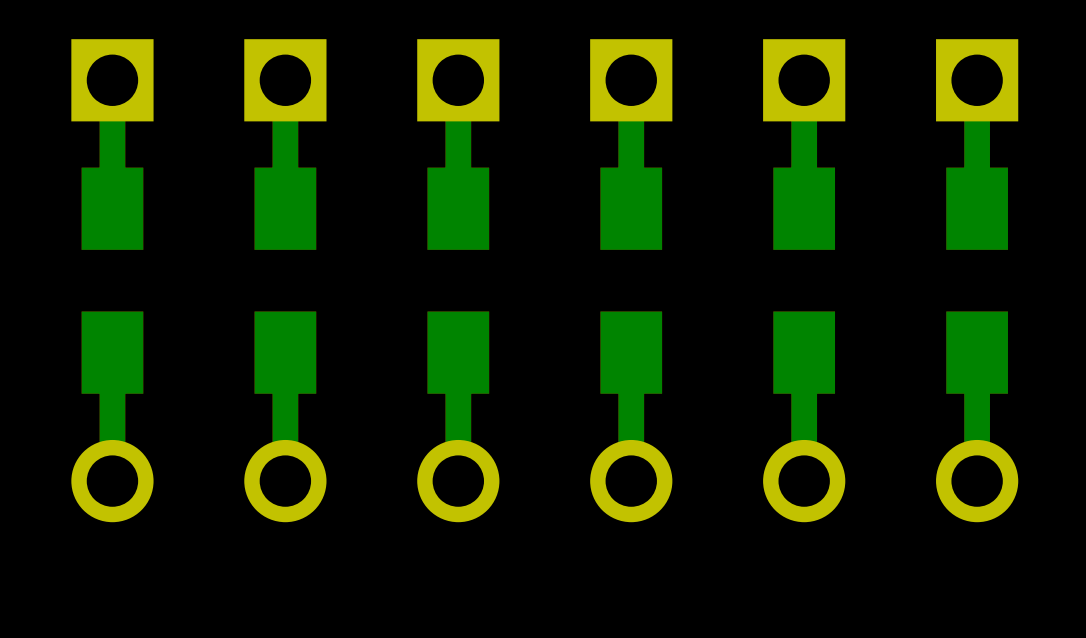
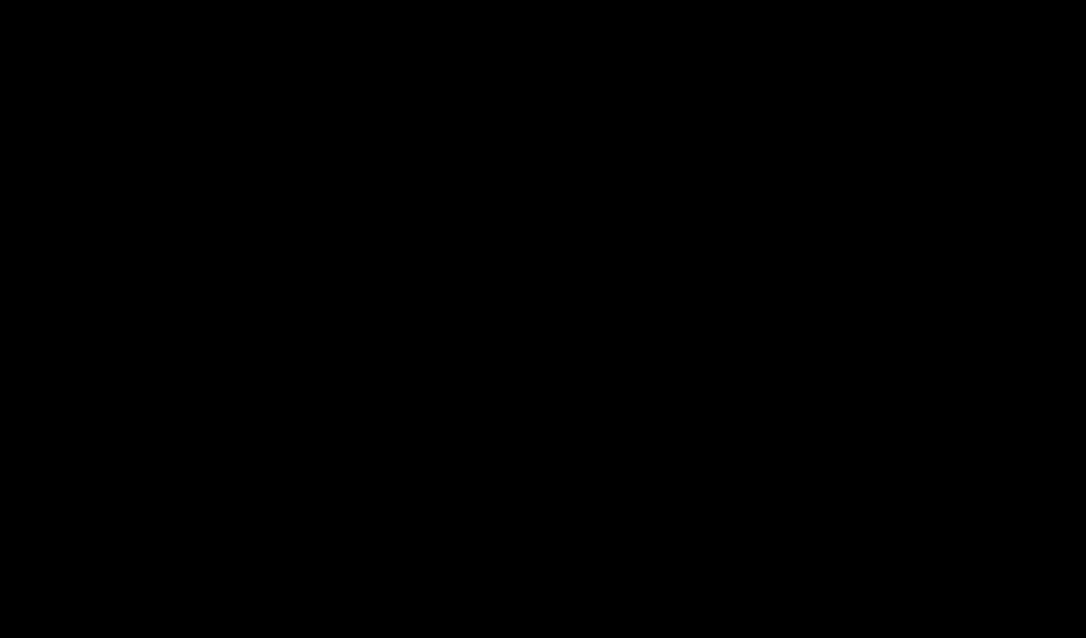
part: (112, 280) -> none
part: (285, 280) -> none
part: (458, 280) -> none
part: (631, 280) -> none
part: (804, 280) -> none
part: (977, 280) -> none

